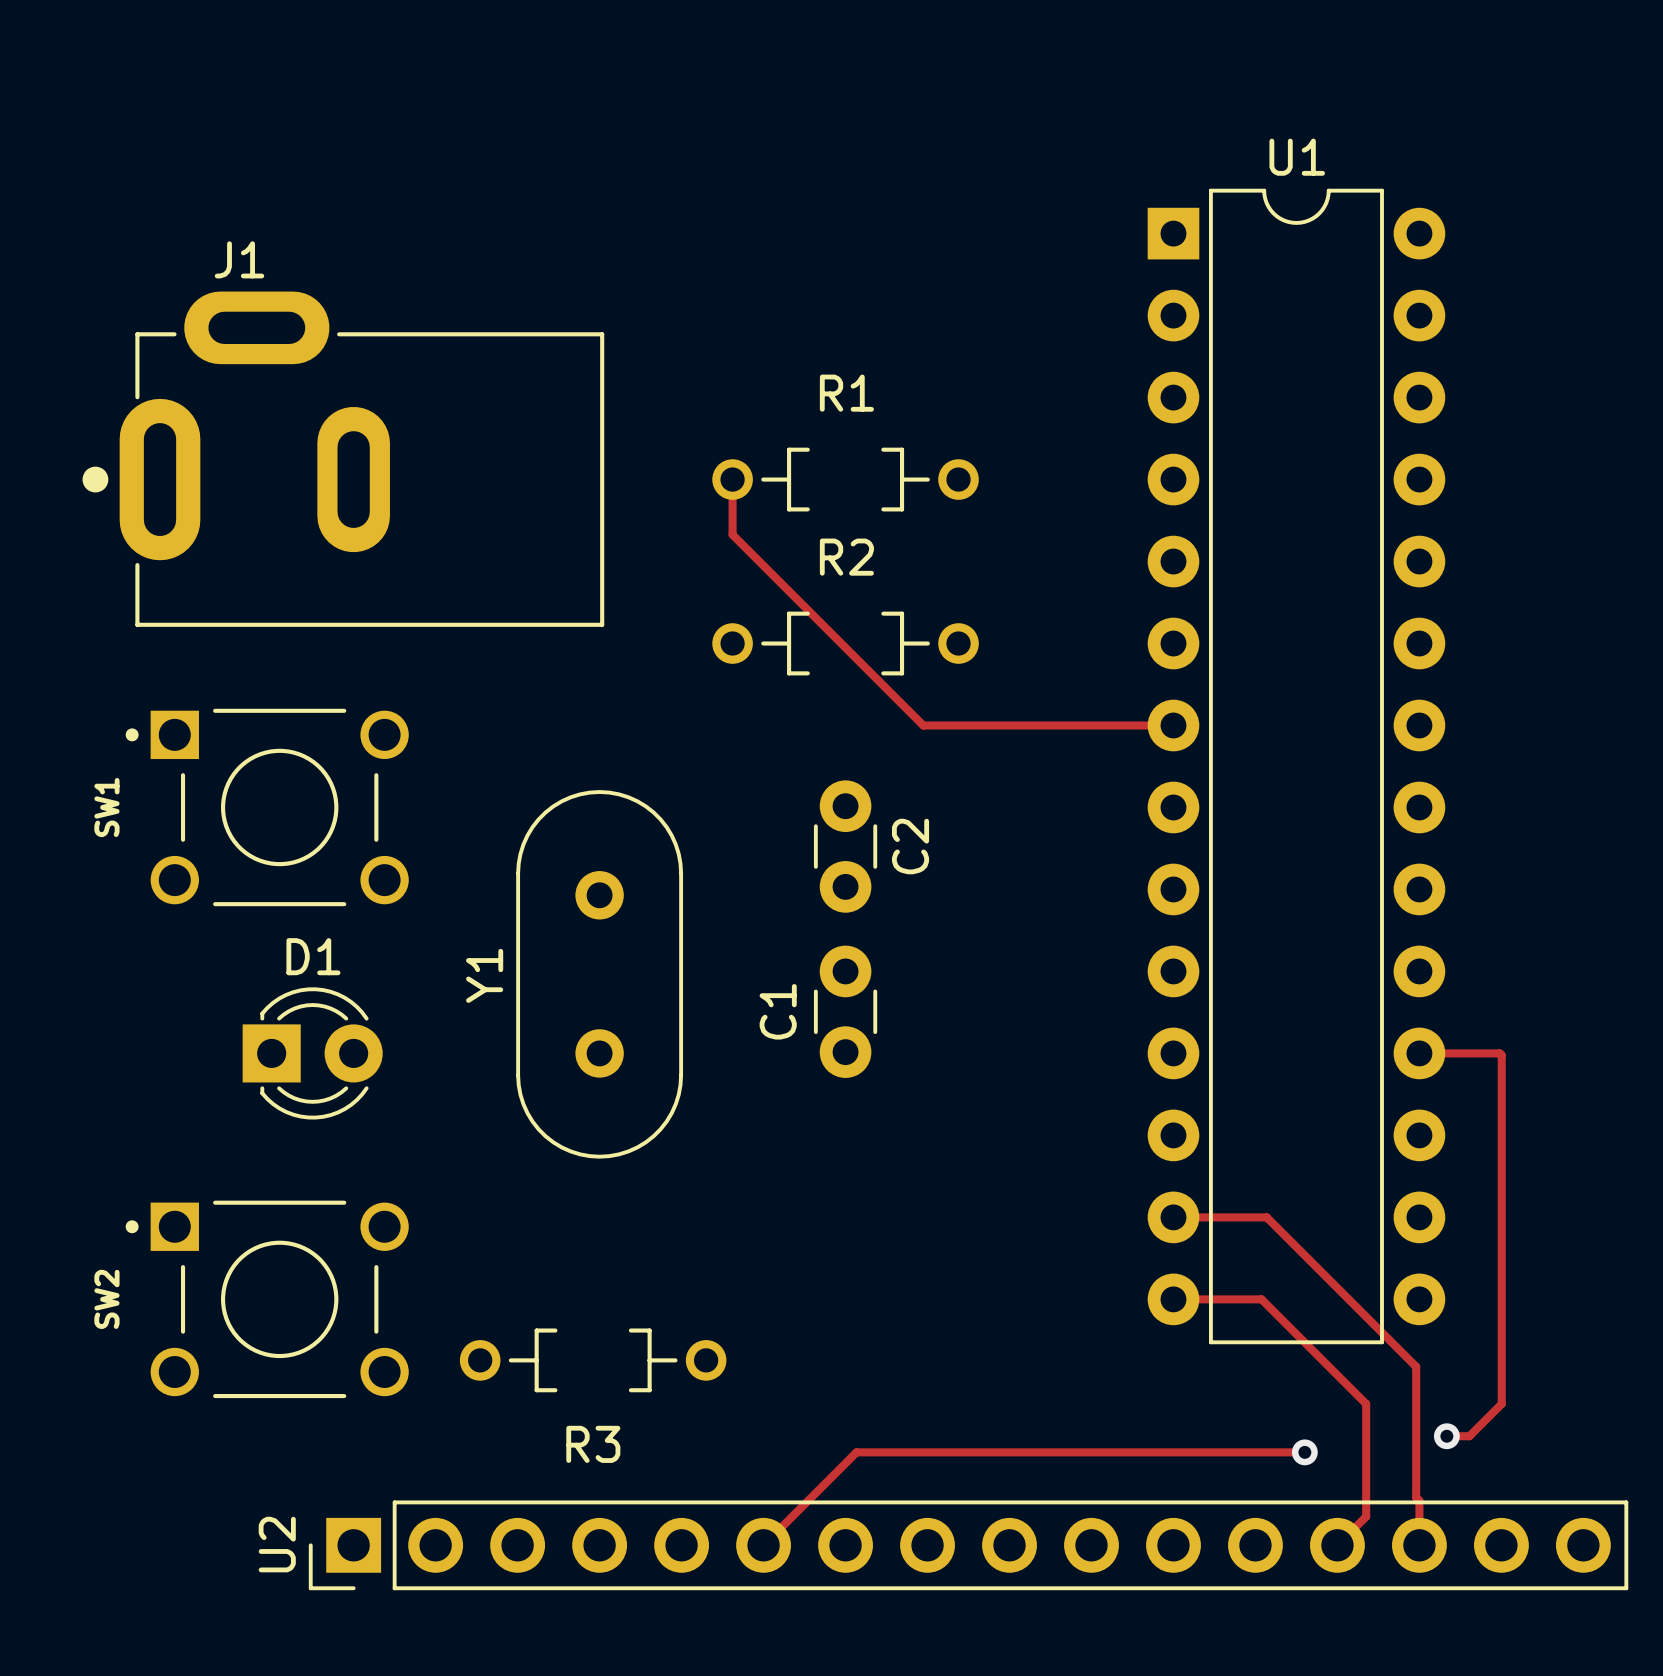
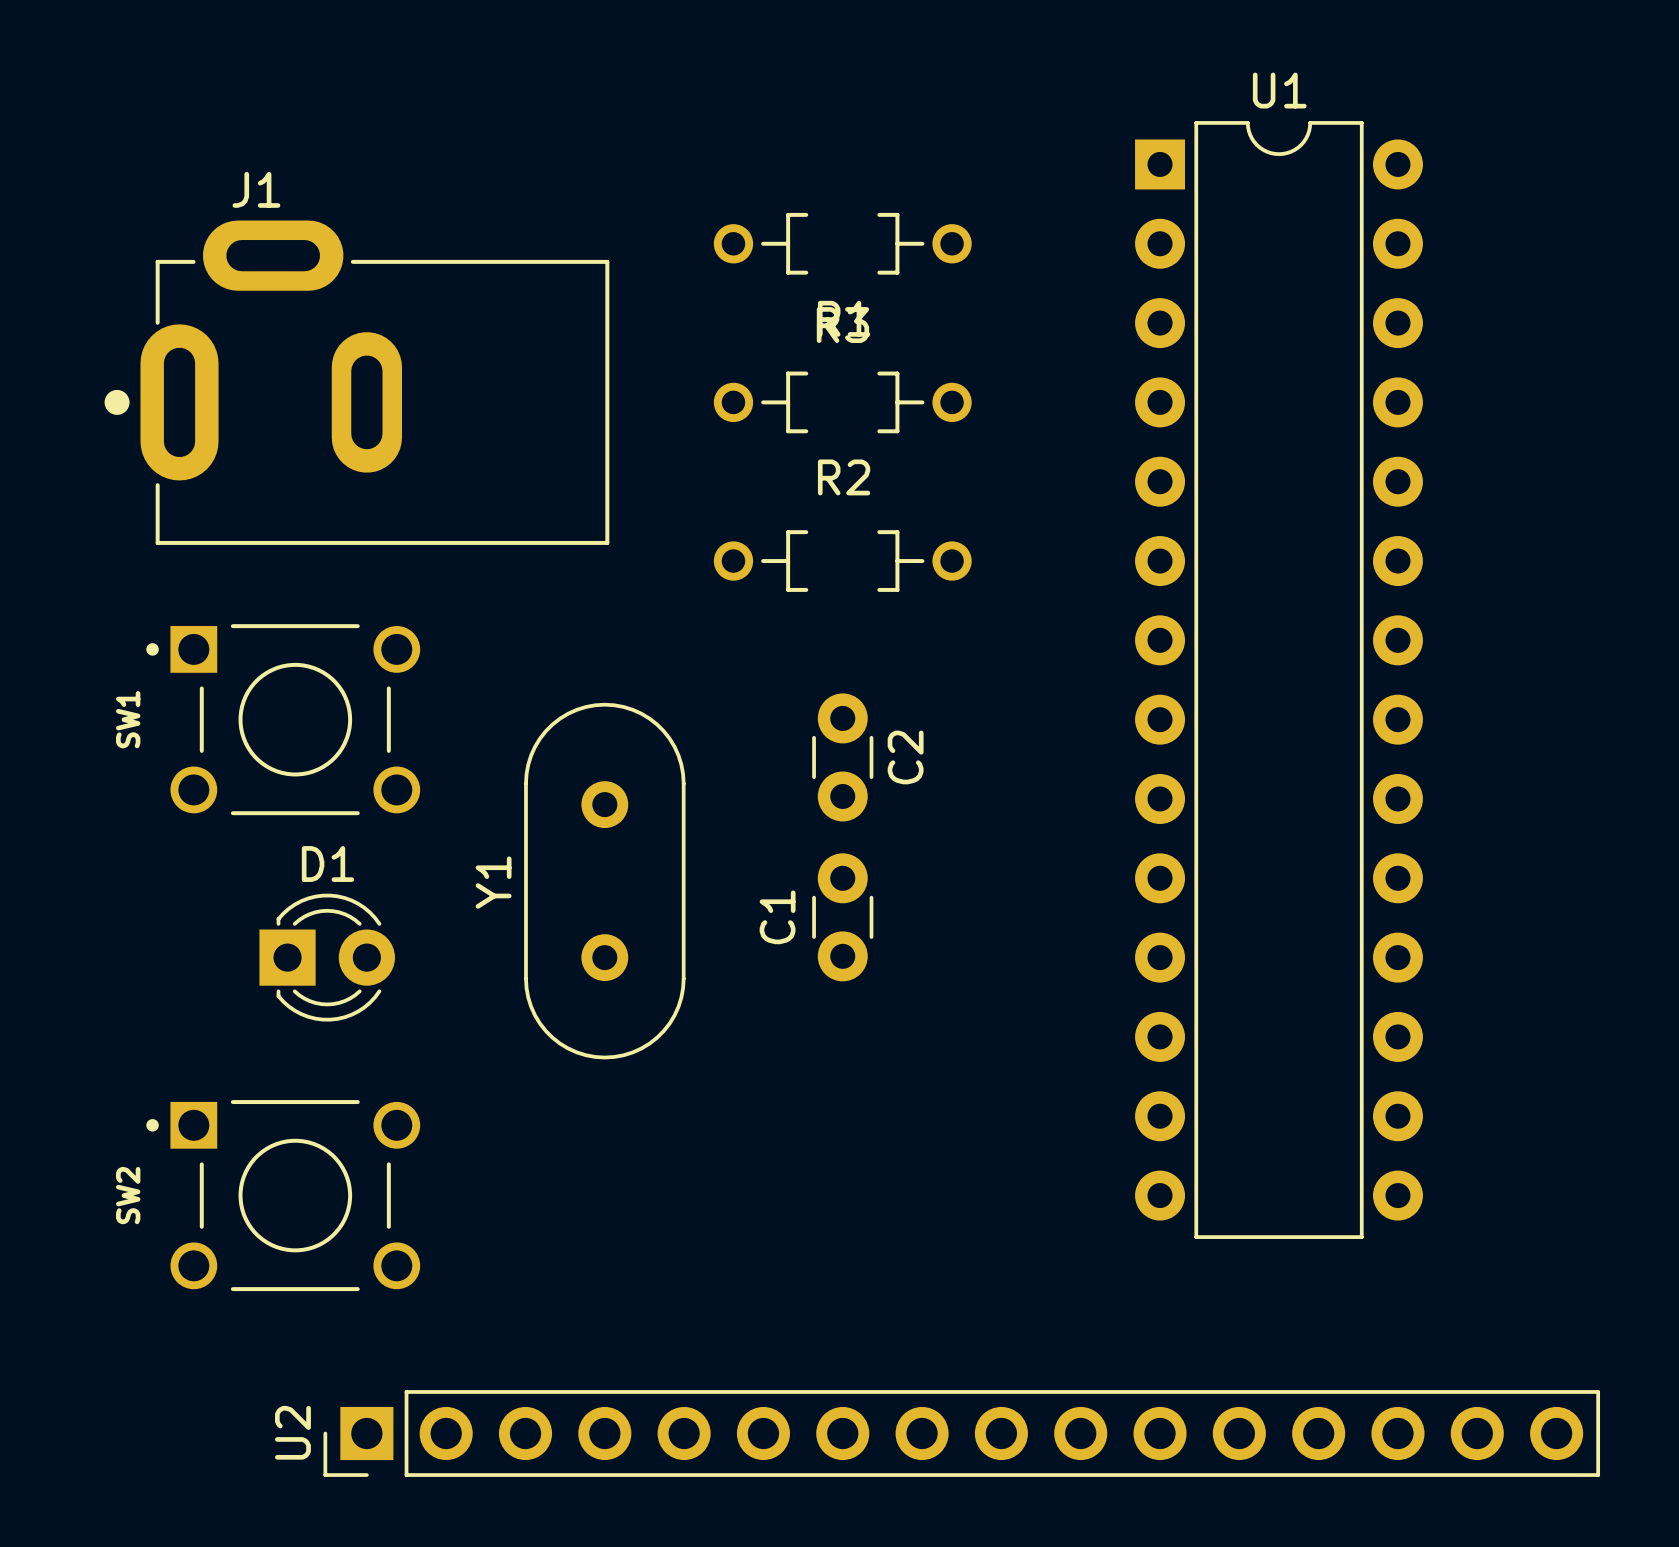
track: (732, 479) (732, 534) (923, 725) (1173, 725) -> none
track: (1419, 1053) (1499, 1053) (1501, 1055) (1501, 1403) (1469, 1436) (1446, 1436) -> none
track: (1173, 1217) (1266, 1217) (1416, 1366) (1416, 1497) (1419, 1500) (1419, 1545) -> none
track: (1173, 1299) (1261, 1299) (1366, 1403) (1366, 1516) (1337, 1545) -> none
R3 position: (593, 1360) -> (842, 243)
via: (1446, 1436) -> none
track: (1304, 1452) (856, 1452) (763, 1545) -> none
via: (1304, 1452) -> none

